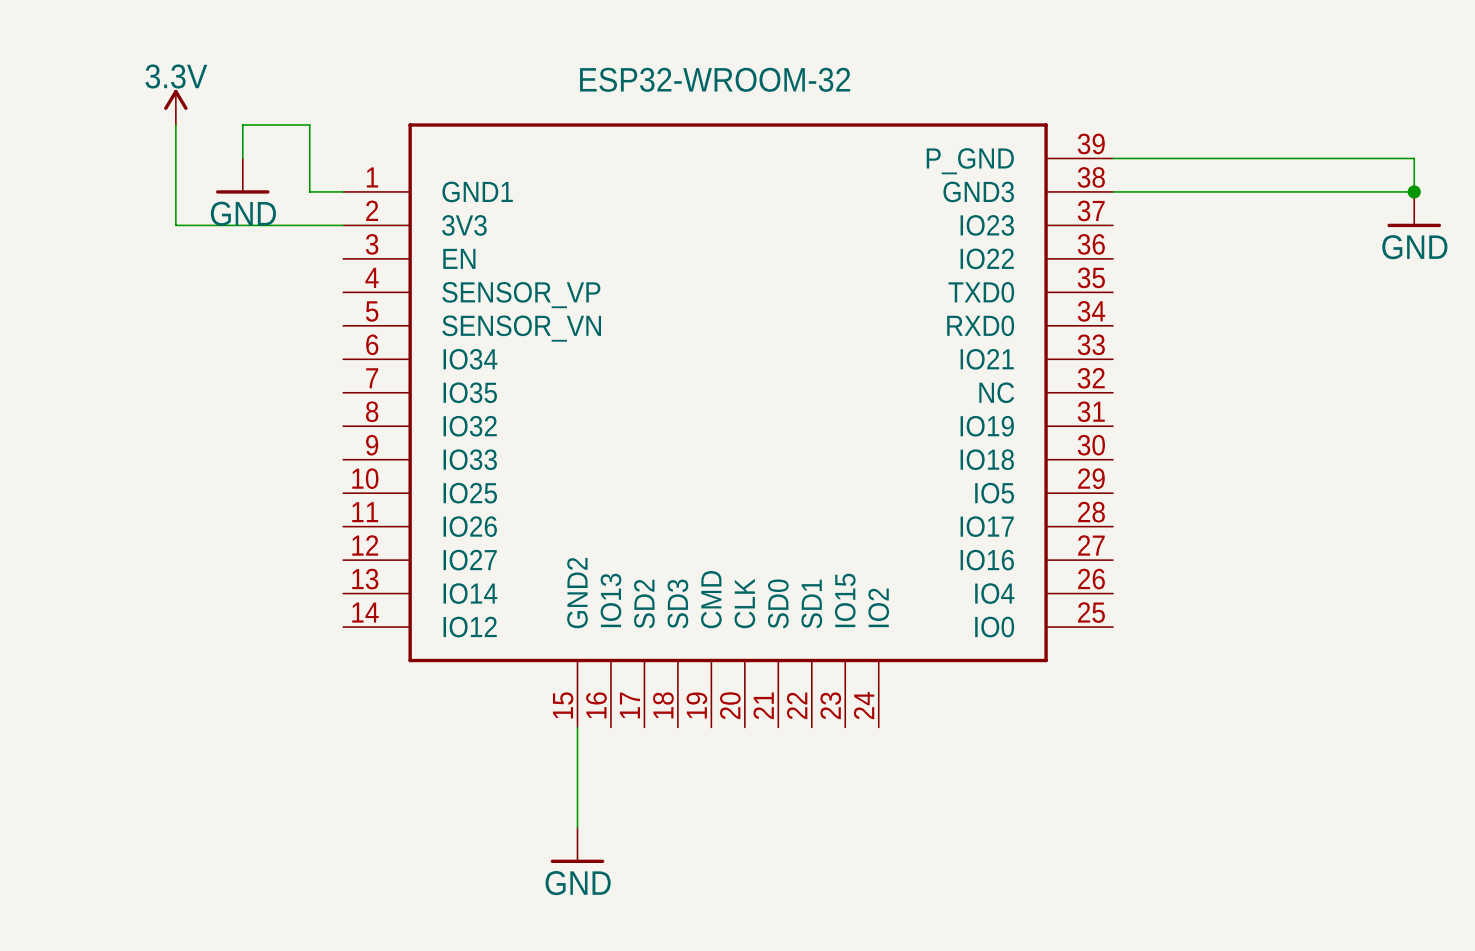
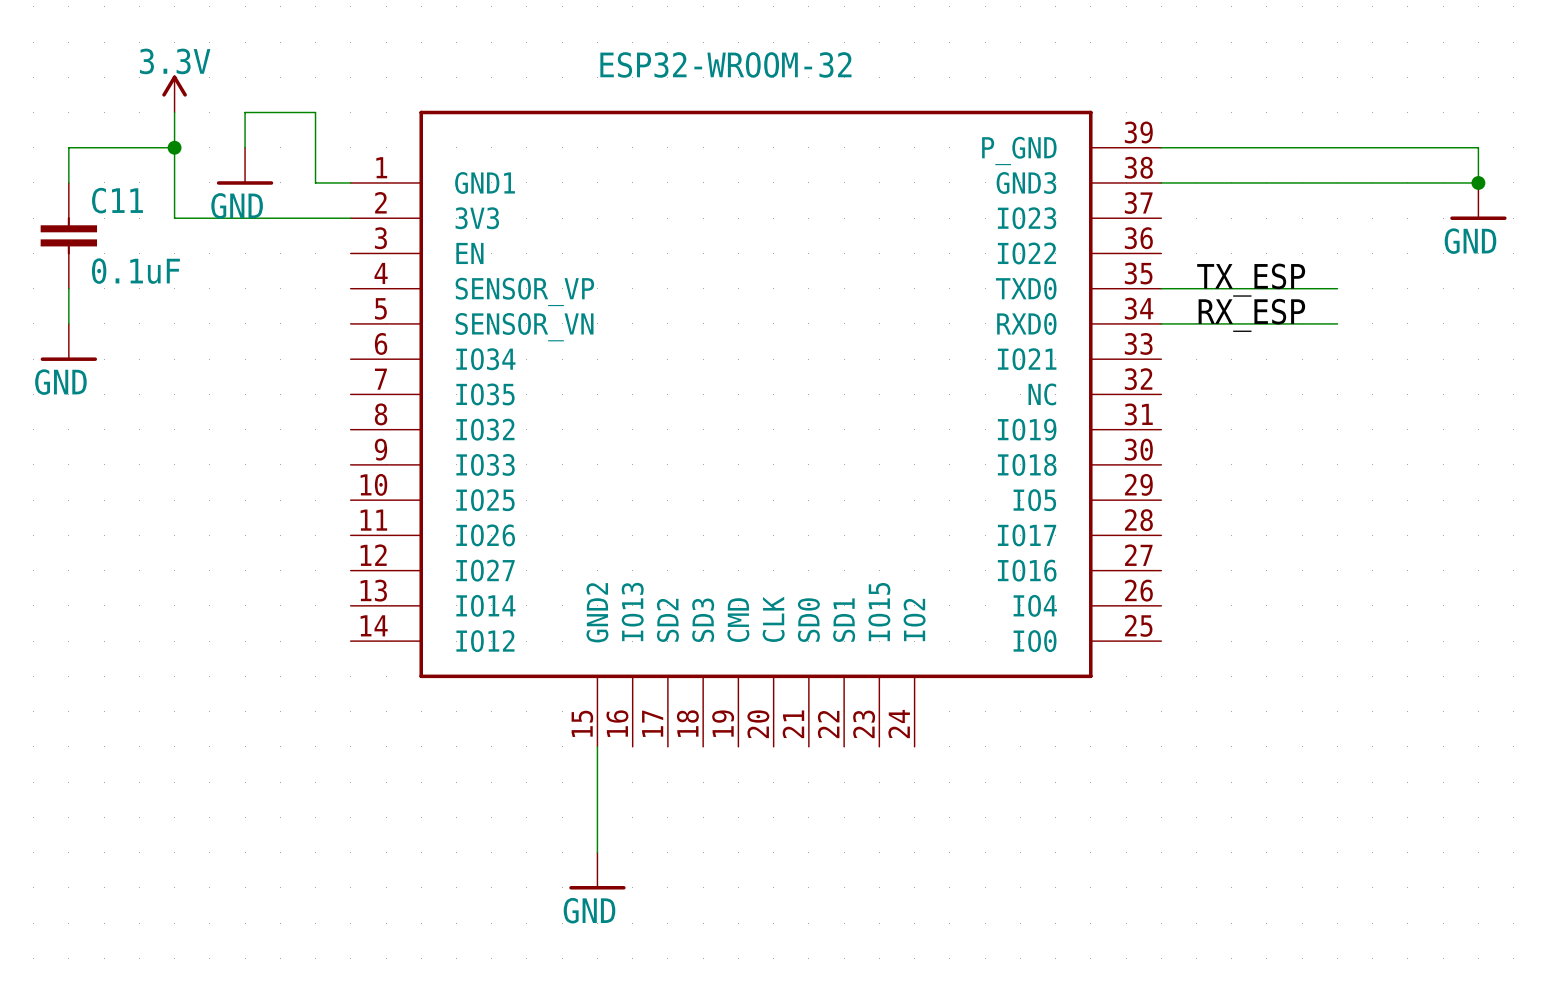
wire: none -> (174, 147) (68, 147) (68, 182)
junction: none -> (174, 147)
C11: none -> 0.1uF (68, 235)
label: none -> TX_ESP (1251, 280)
wire: none -> (68, 288) (68, 323)
wire: none -> (1161, 288) (1337, 288)
label: none -> RX_ESP (1251, 315)
wire: none -> (1161, 323) (1337, 323)
power symbol: none -> GND (68, 342)

